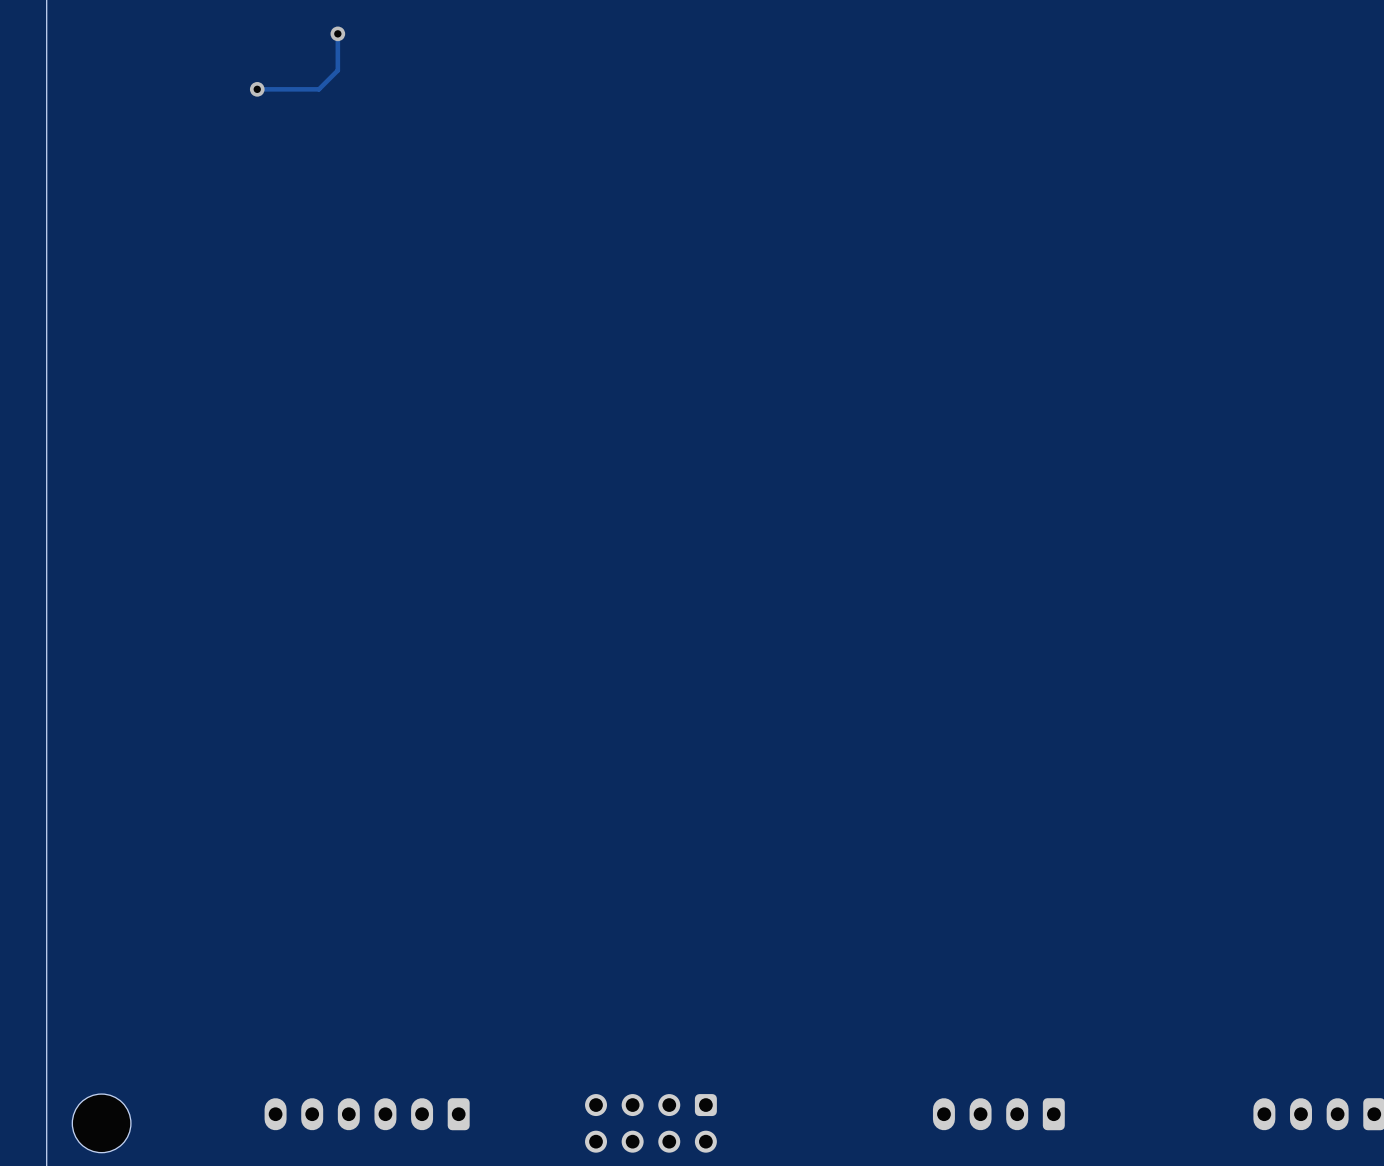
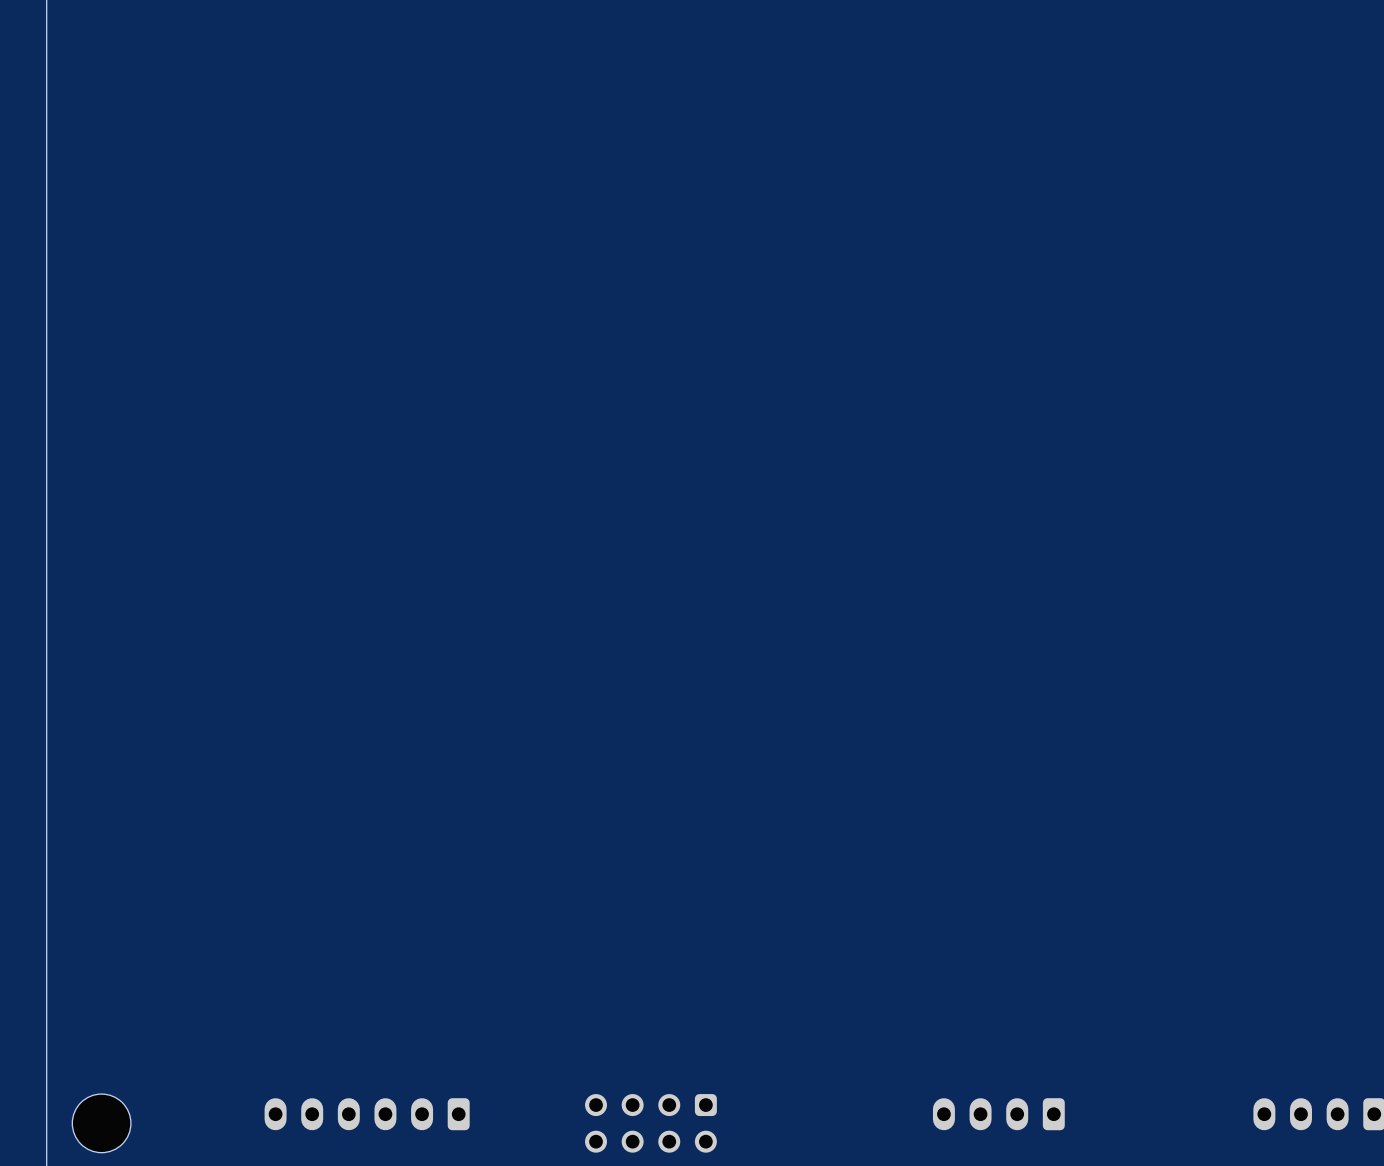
track: (337, 33) (337, 70) (318, 89) (257, 89) -> none
via: (337, 33) -> none
via: (257, 89) -> none

